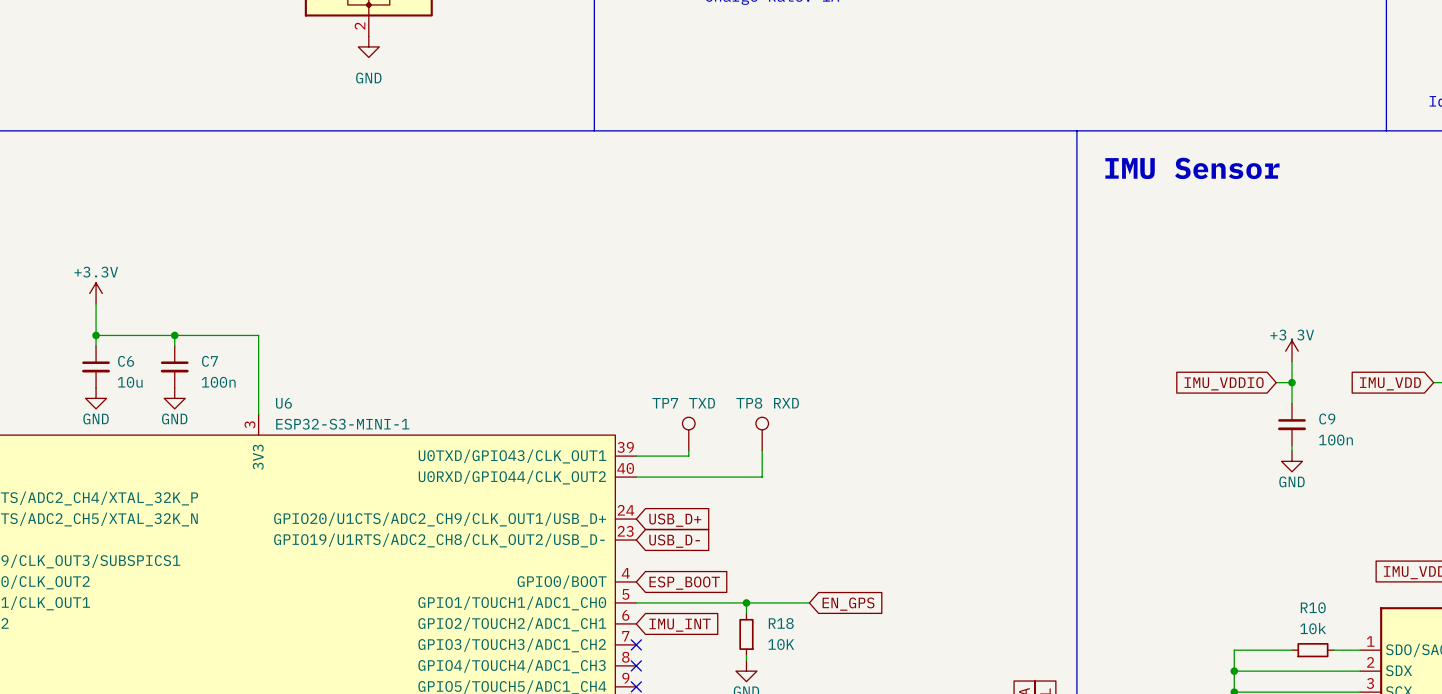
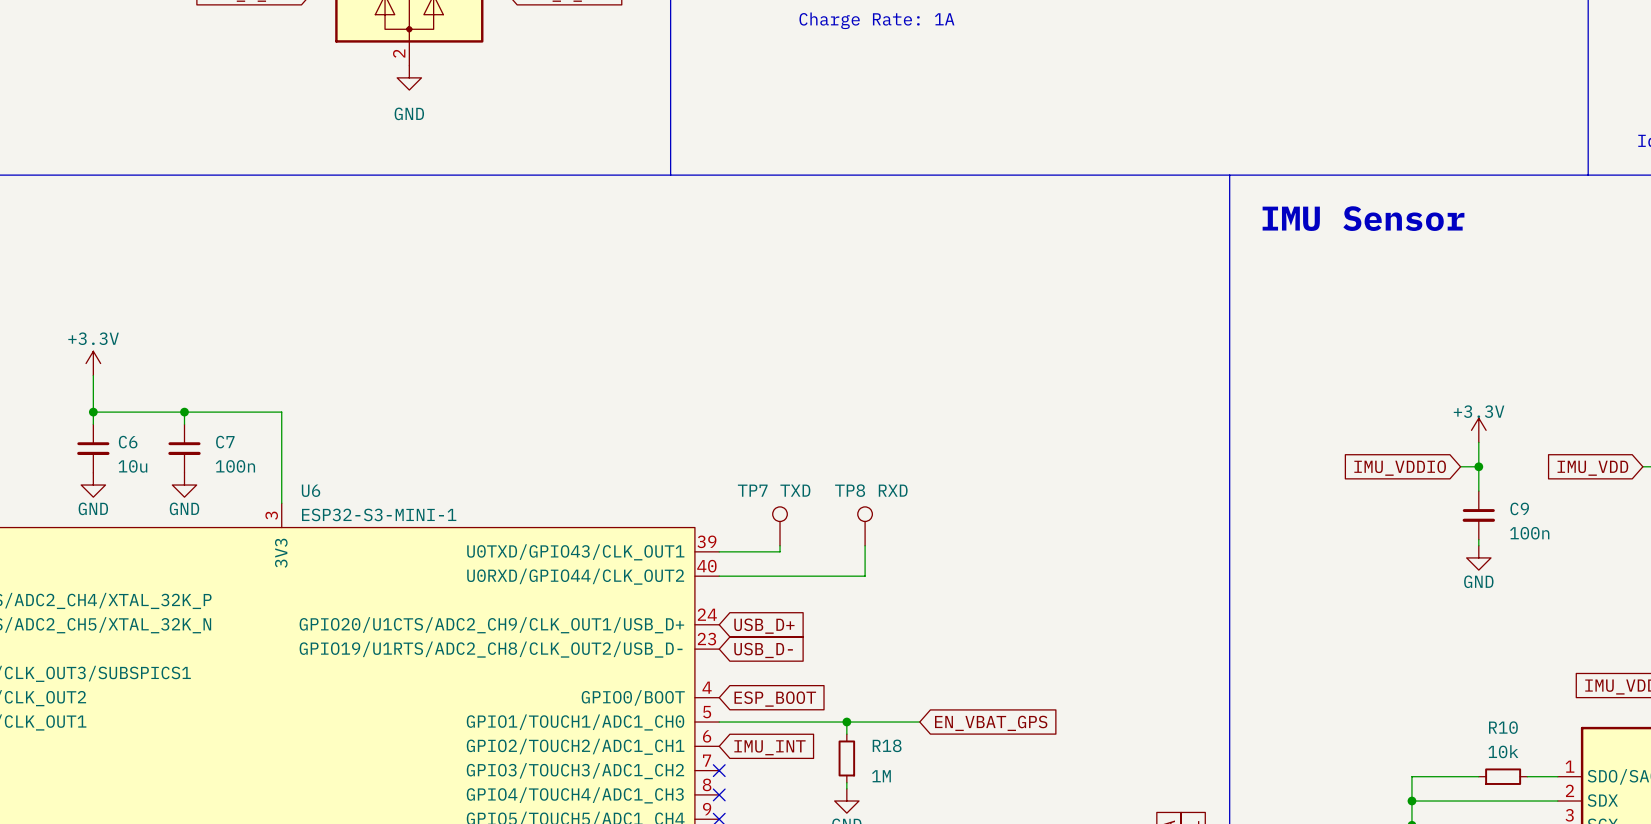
global label: EN_GPS (848, 604) -> EN_VBAT_GPS (991, 723)
R18 value: 10K (781, 644) -> 1M (881, 776)

